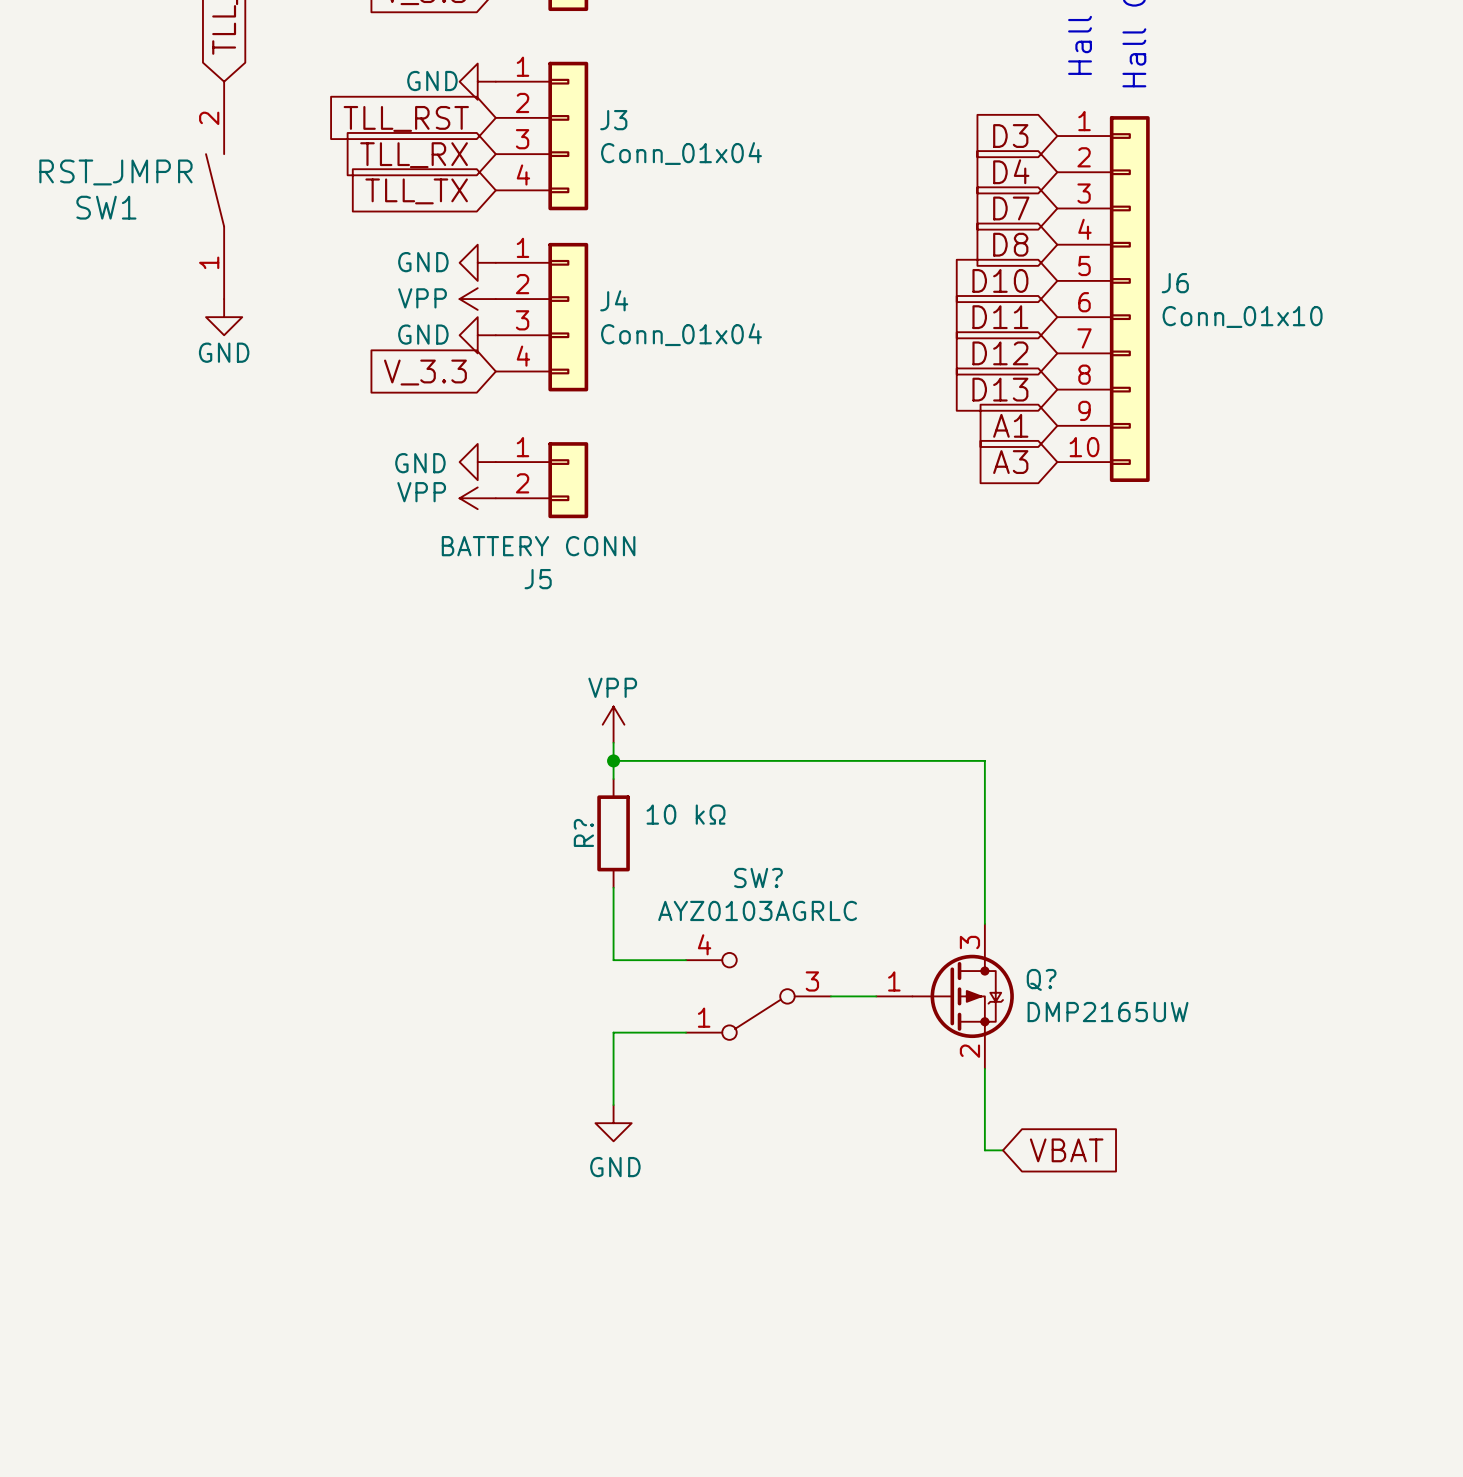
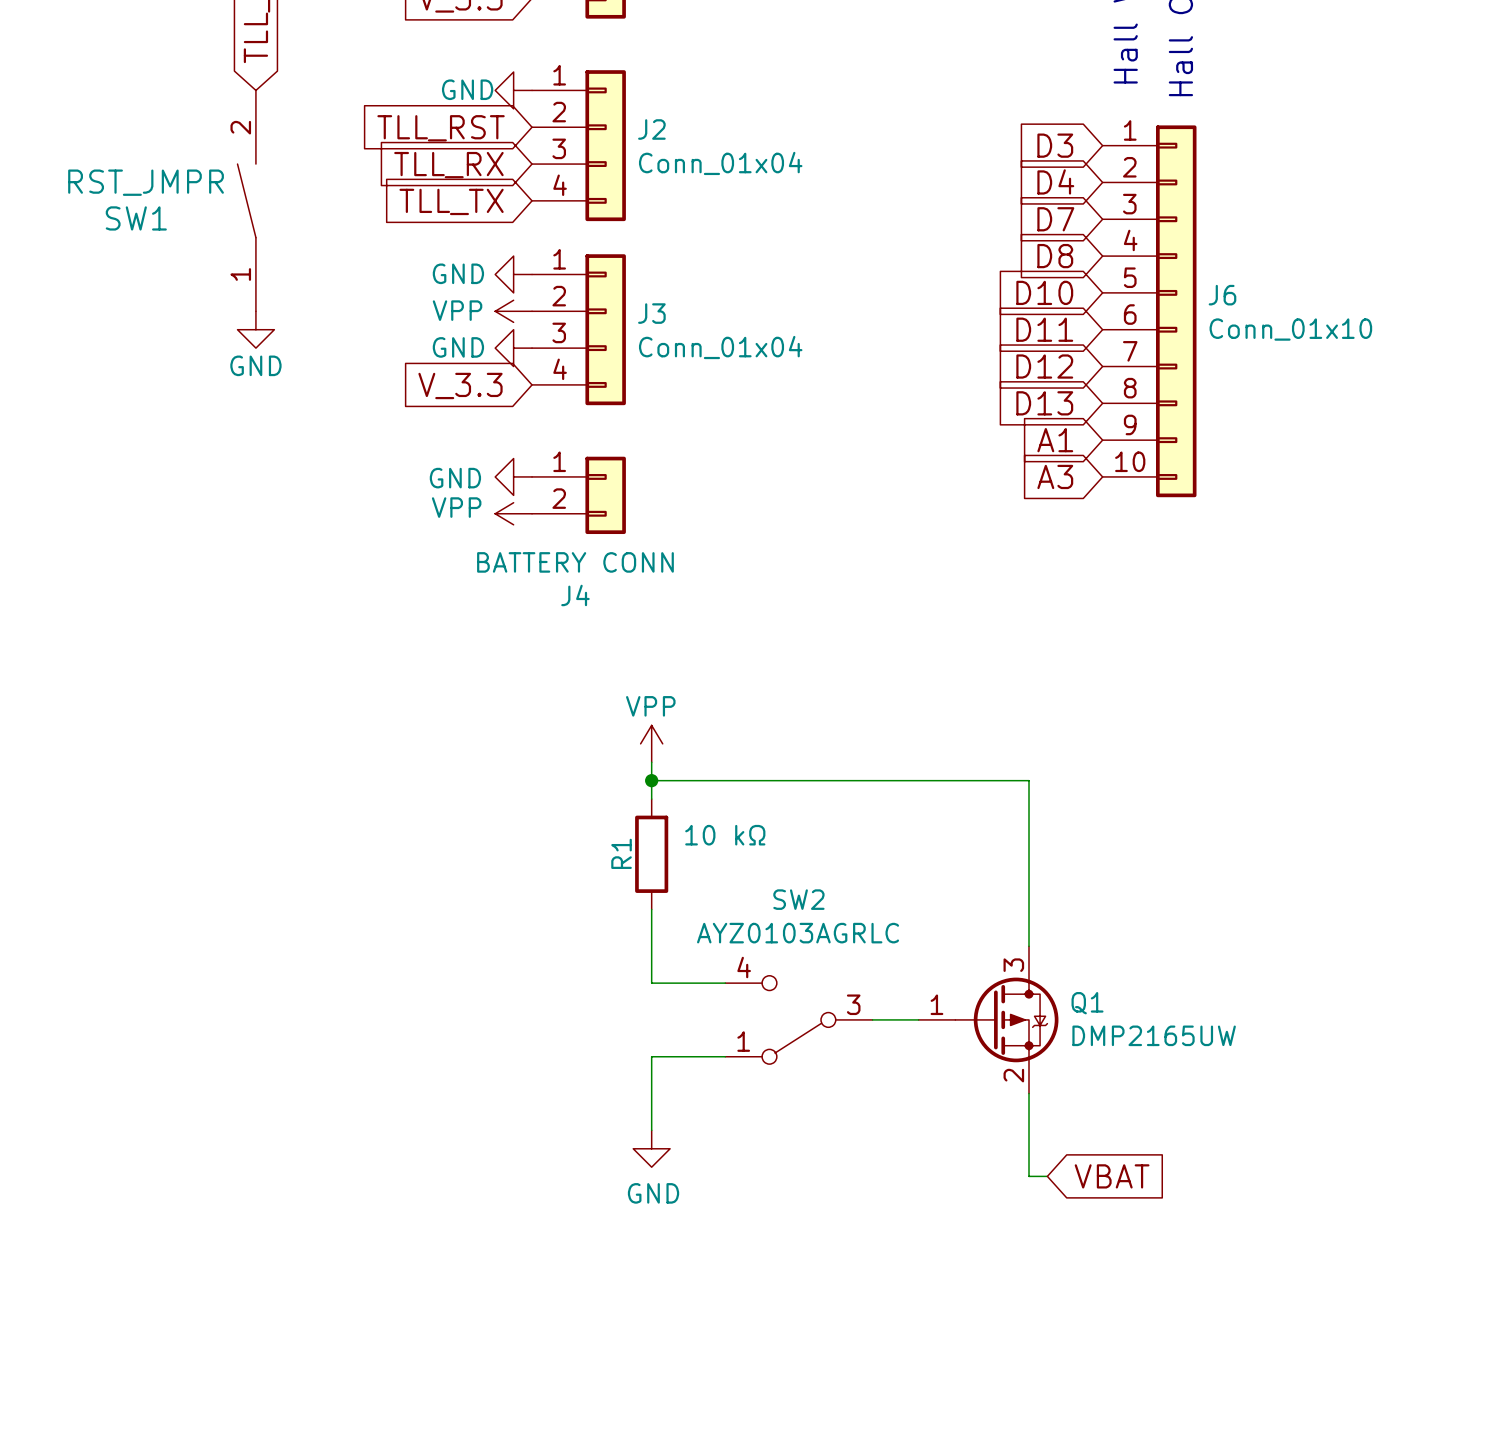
J3 name: J3 (613, 120) -> J2 (651, 129)
J4 name: J4 (614, 300) -> J3 (651, 313)
J5 name: J5 (538, 579) -> J4 (575, 595)
R? name: R? (583, 832) -> R1 (621, 853)
SW? name: SW? (758, 877) -> SW2 (798, 899)
Q? name: Q? (1041, 979) -> Q1 (1087, 1003)

